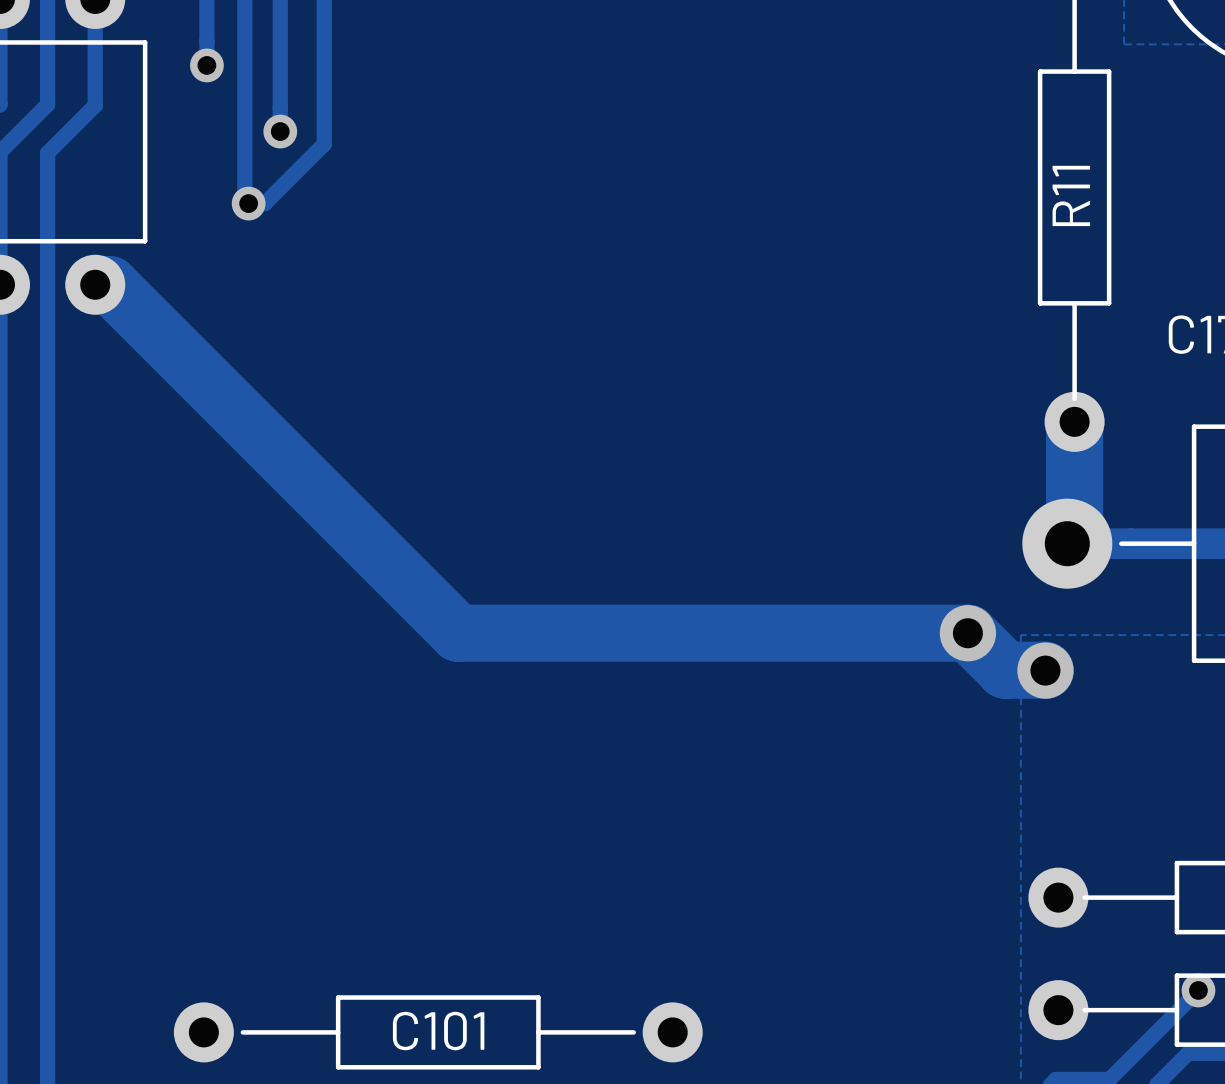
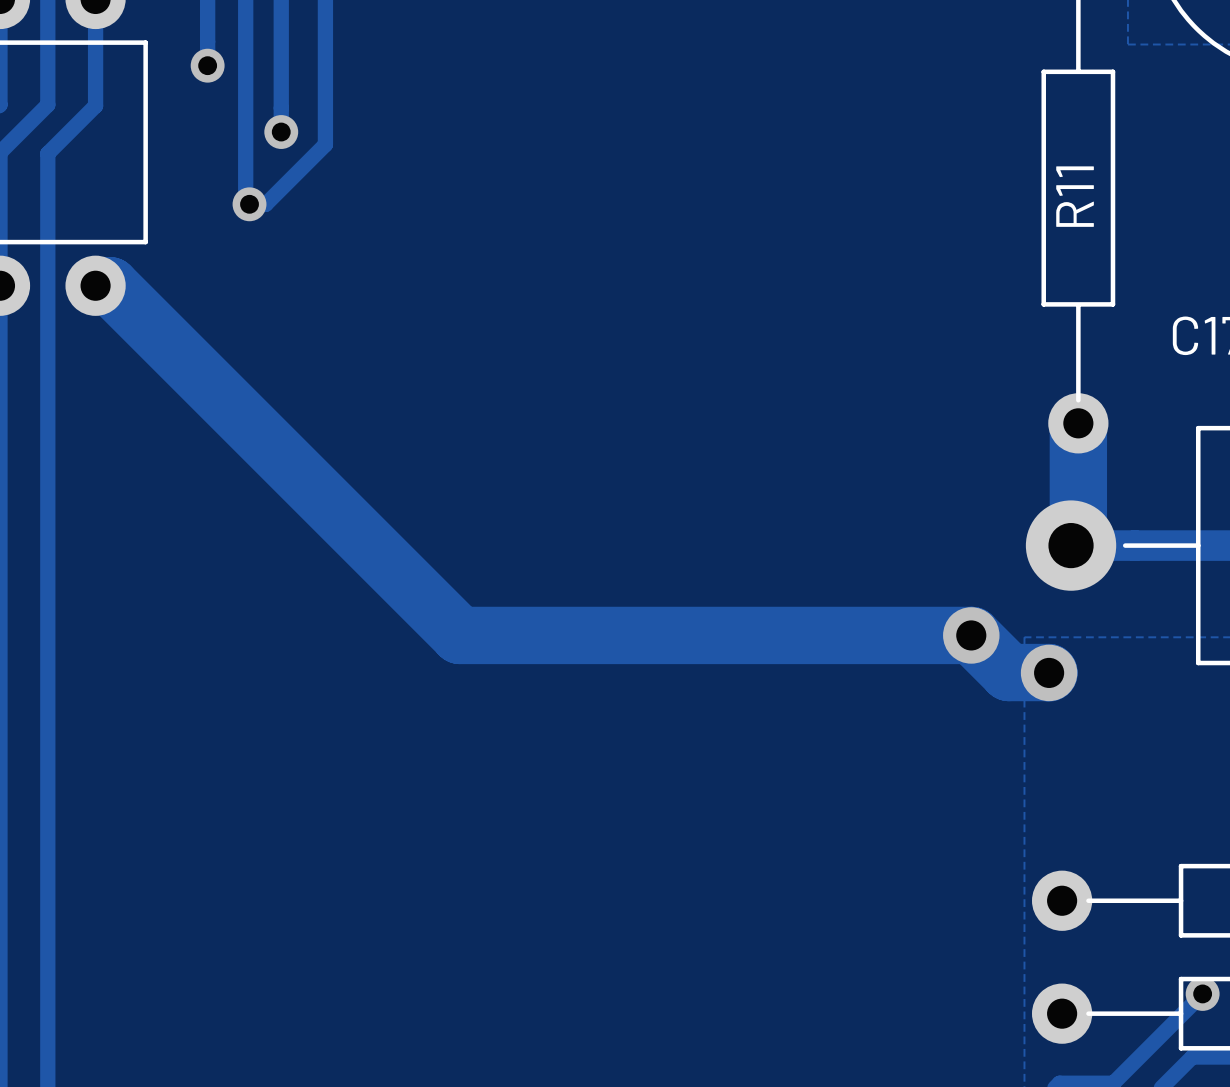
C101: (438, 1032) -> none

